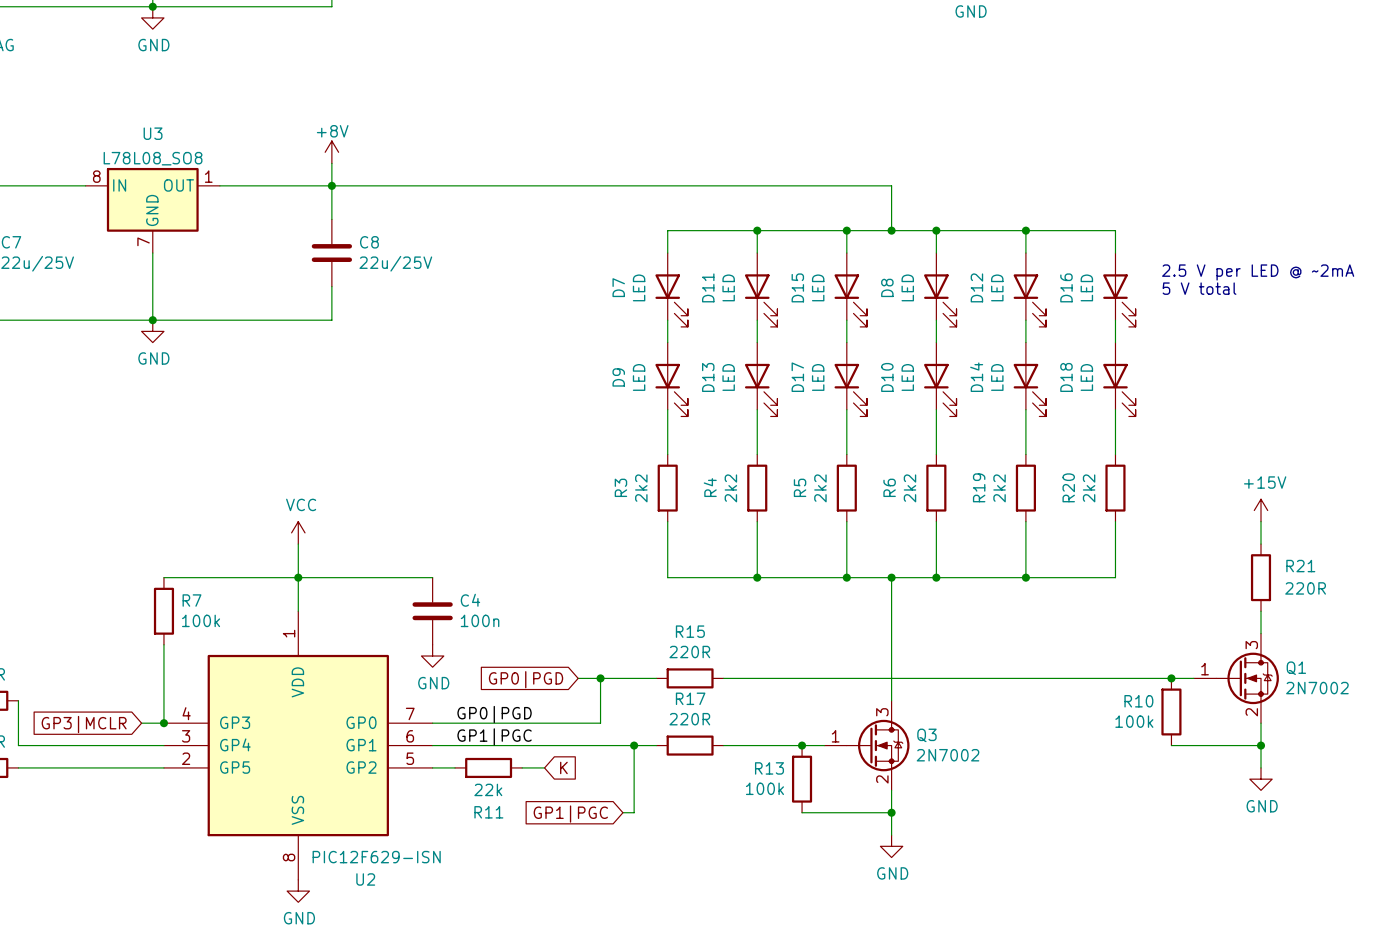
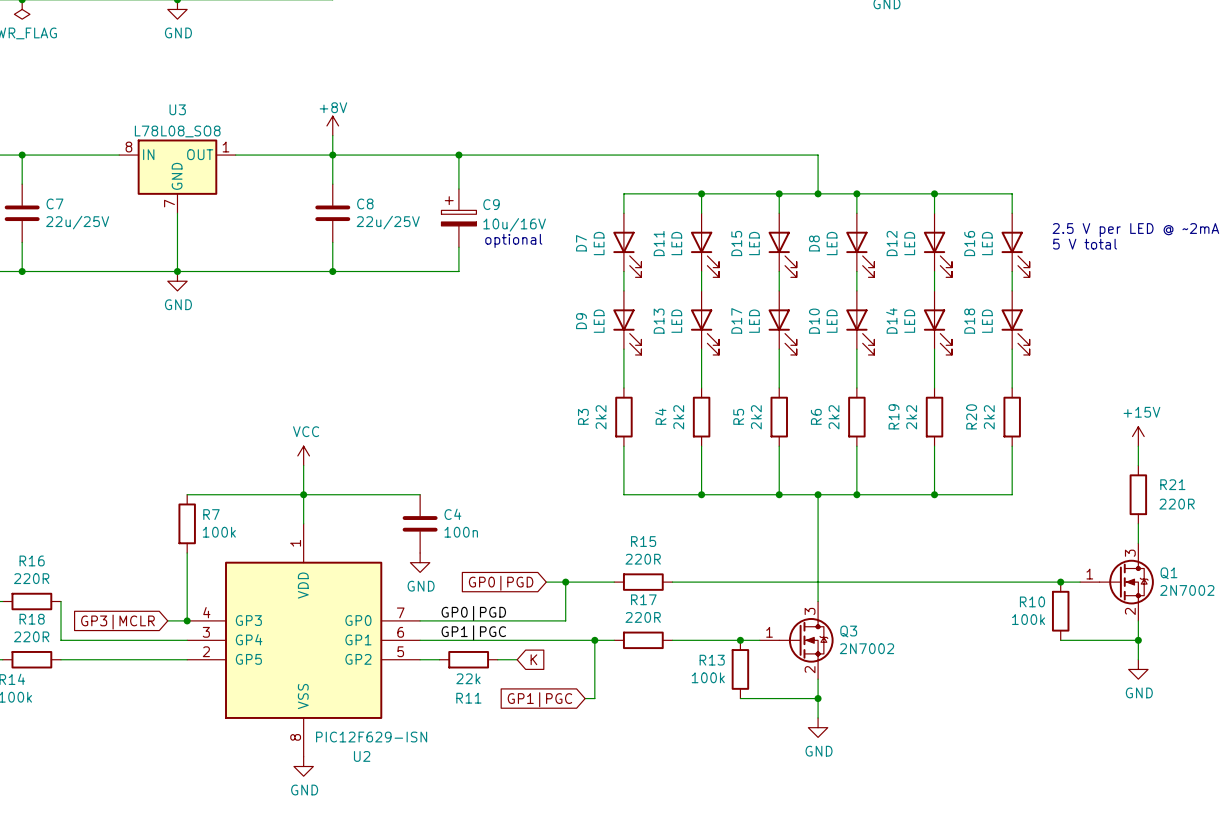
wire: none -> (458, 155) (458, 189)
junction: none -> (458, 155)
C9: none -> 10u/16V (458, 218)
text: none -> optional (513, 240)
wire: none -> (458, 247) (458, 271) (332, 271)
junction: none -> (332, 271)

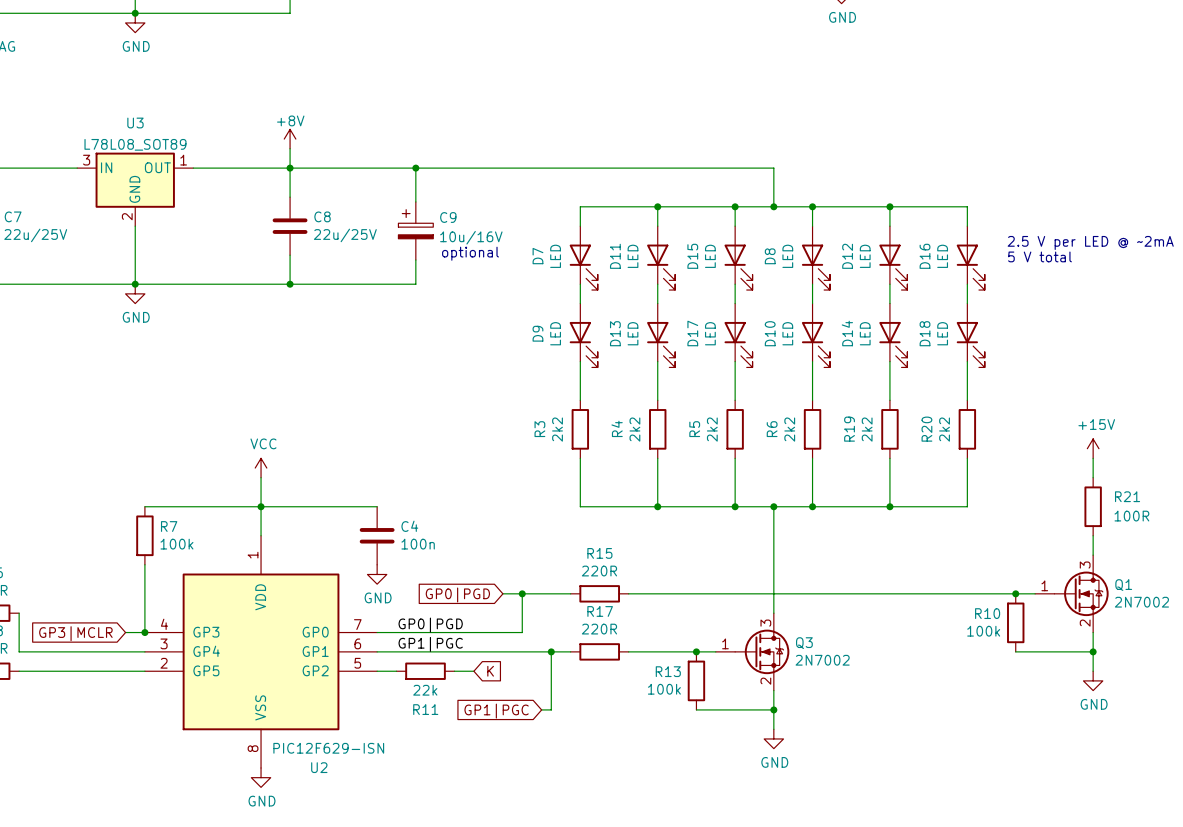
U3 value: L78L08_SO8 (177, 131) -> L78L08_SOT89 (135, 144)
U3 pin number: 8 (128, 147) -> 3 (86, 160)
U3 pin number: 7 (169, 203) -> 2 (127, 216)
R21 value: 220R (1177, 504) -> 100R (1131, 516)

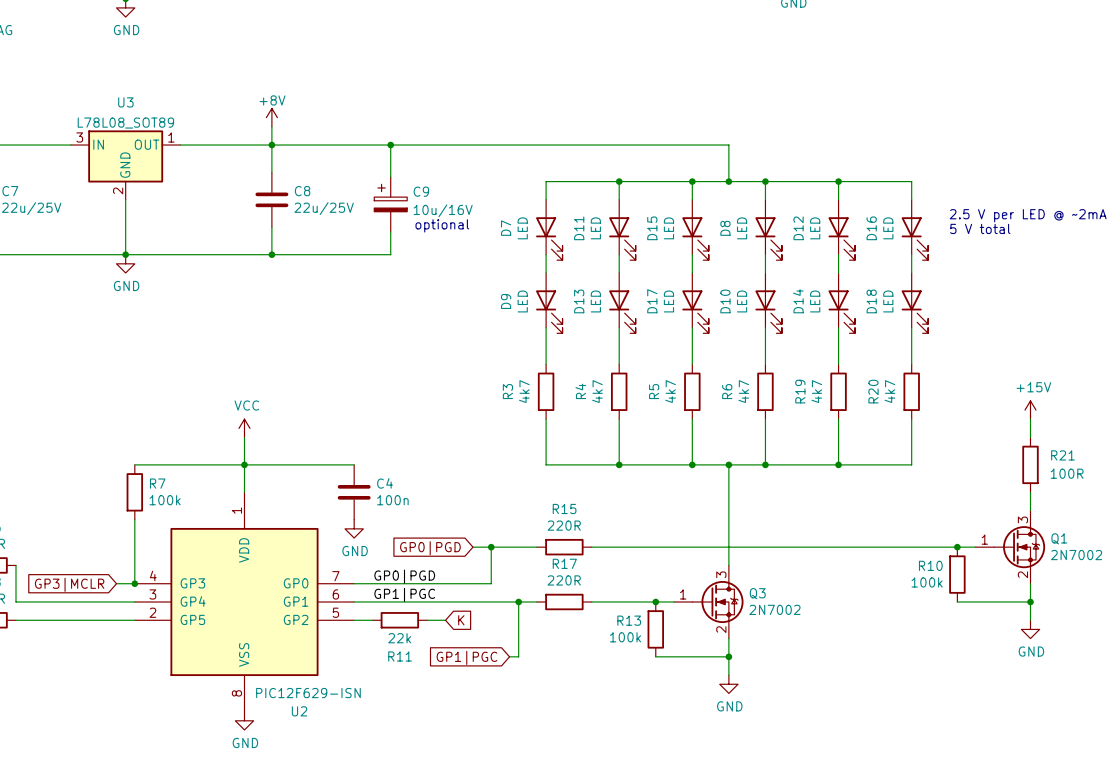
R3 value: 2k2 (557, 429) -> 4k7 (524, 391)
R4 value: 2k2 (634, 429) -> 4k7 (597, 391)
R5 value: 2k2 (712, 429) -> 4k7 (670, 391)
R6 value: 2k2 (789, 429) -> 4k7 (743, 391)
R19 value: 2k2 (867, 429) -> 4k7 (816, 391)
R20 value: 2k2 (944, 429) -> 4k7 (889, 391)

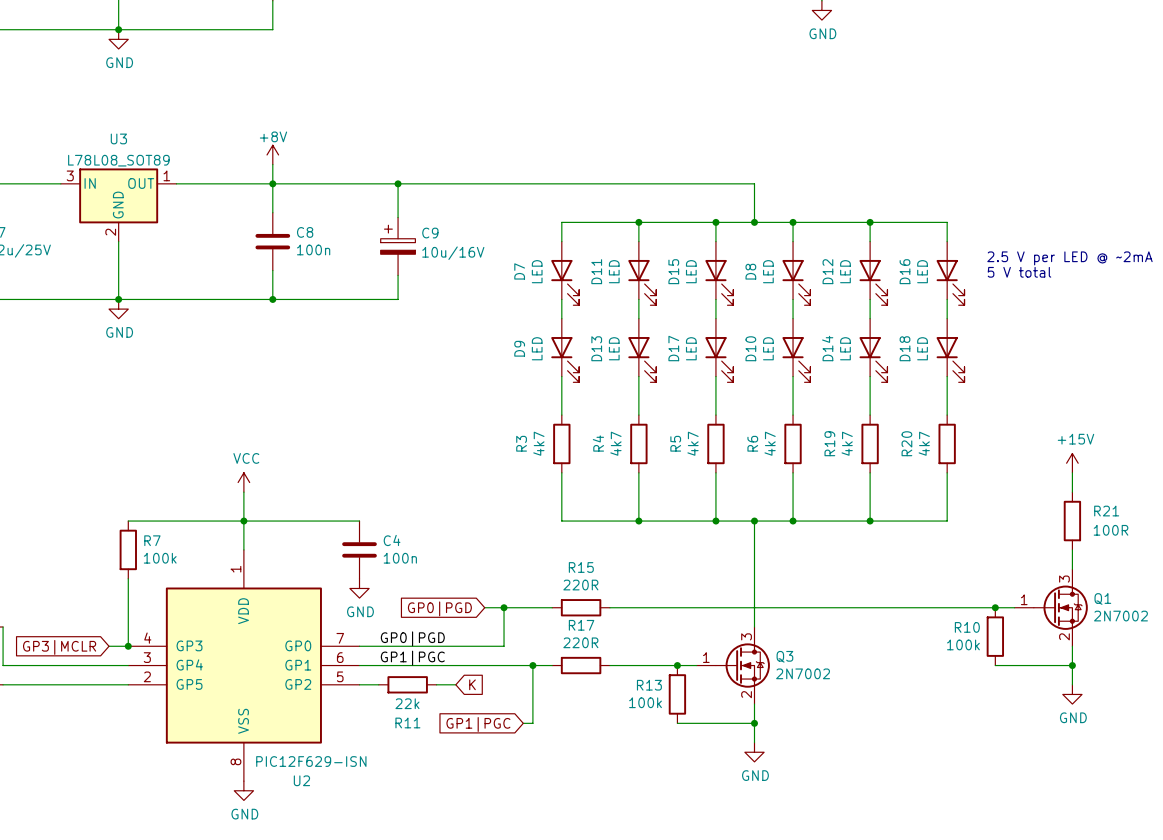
C8 value: 22u/25V (324, 208) -> 100n (313, 249)
text: optional (442, 225) -> none

